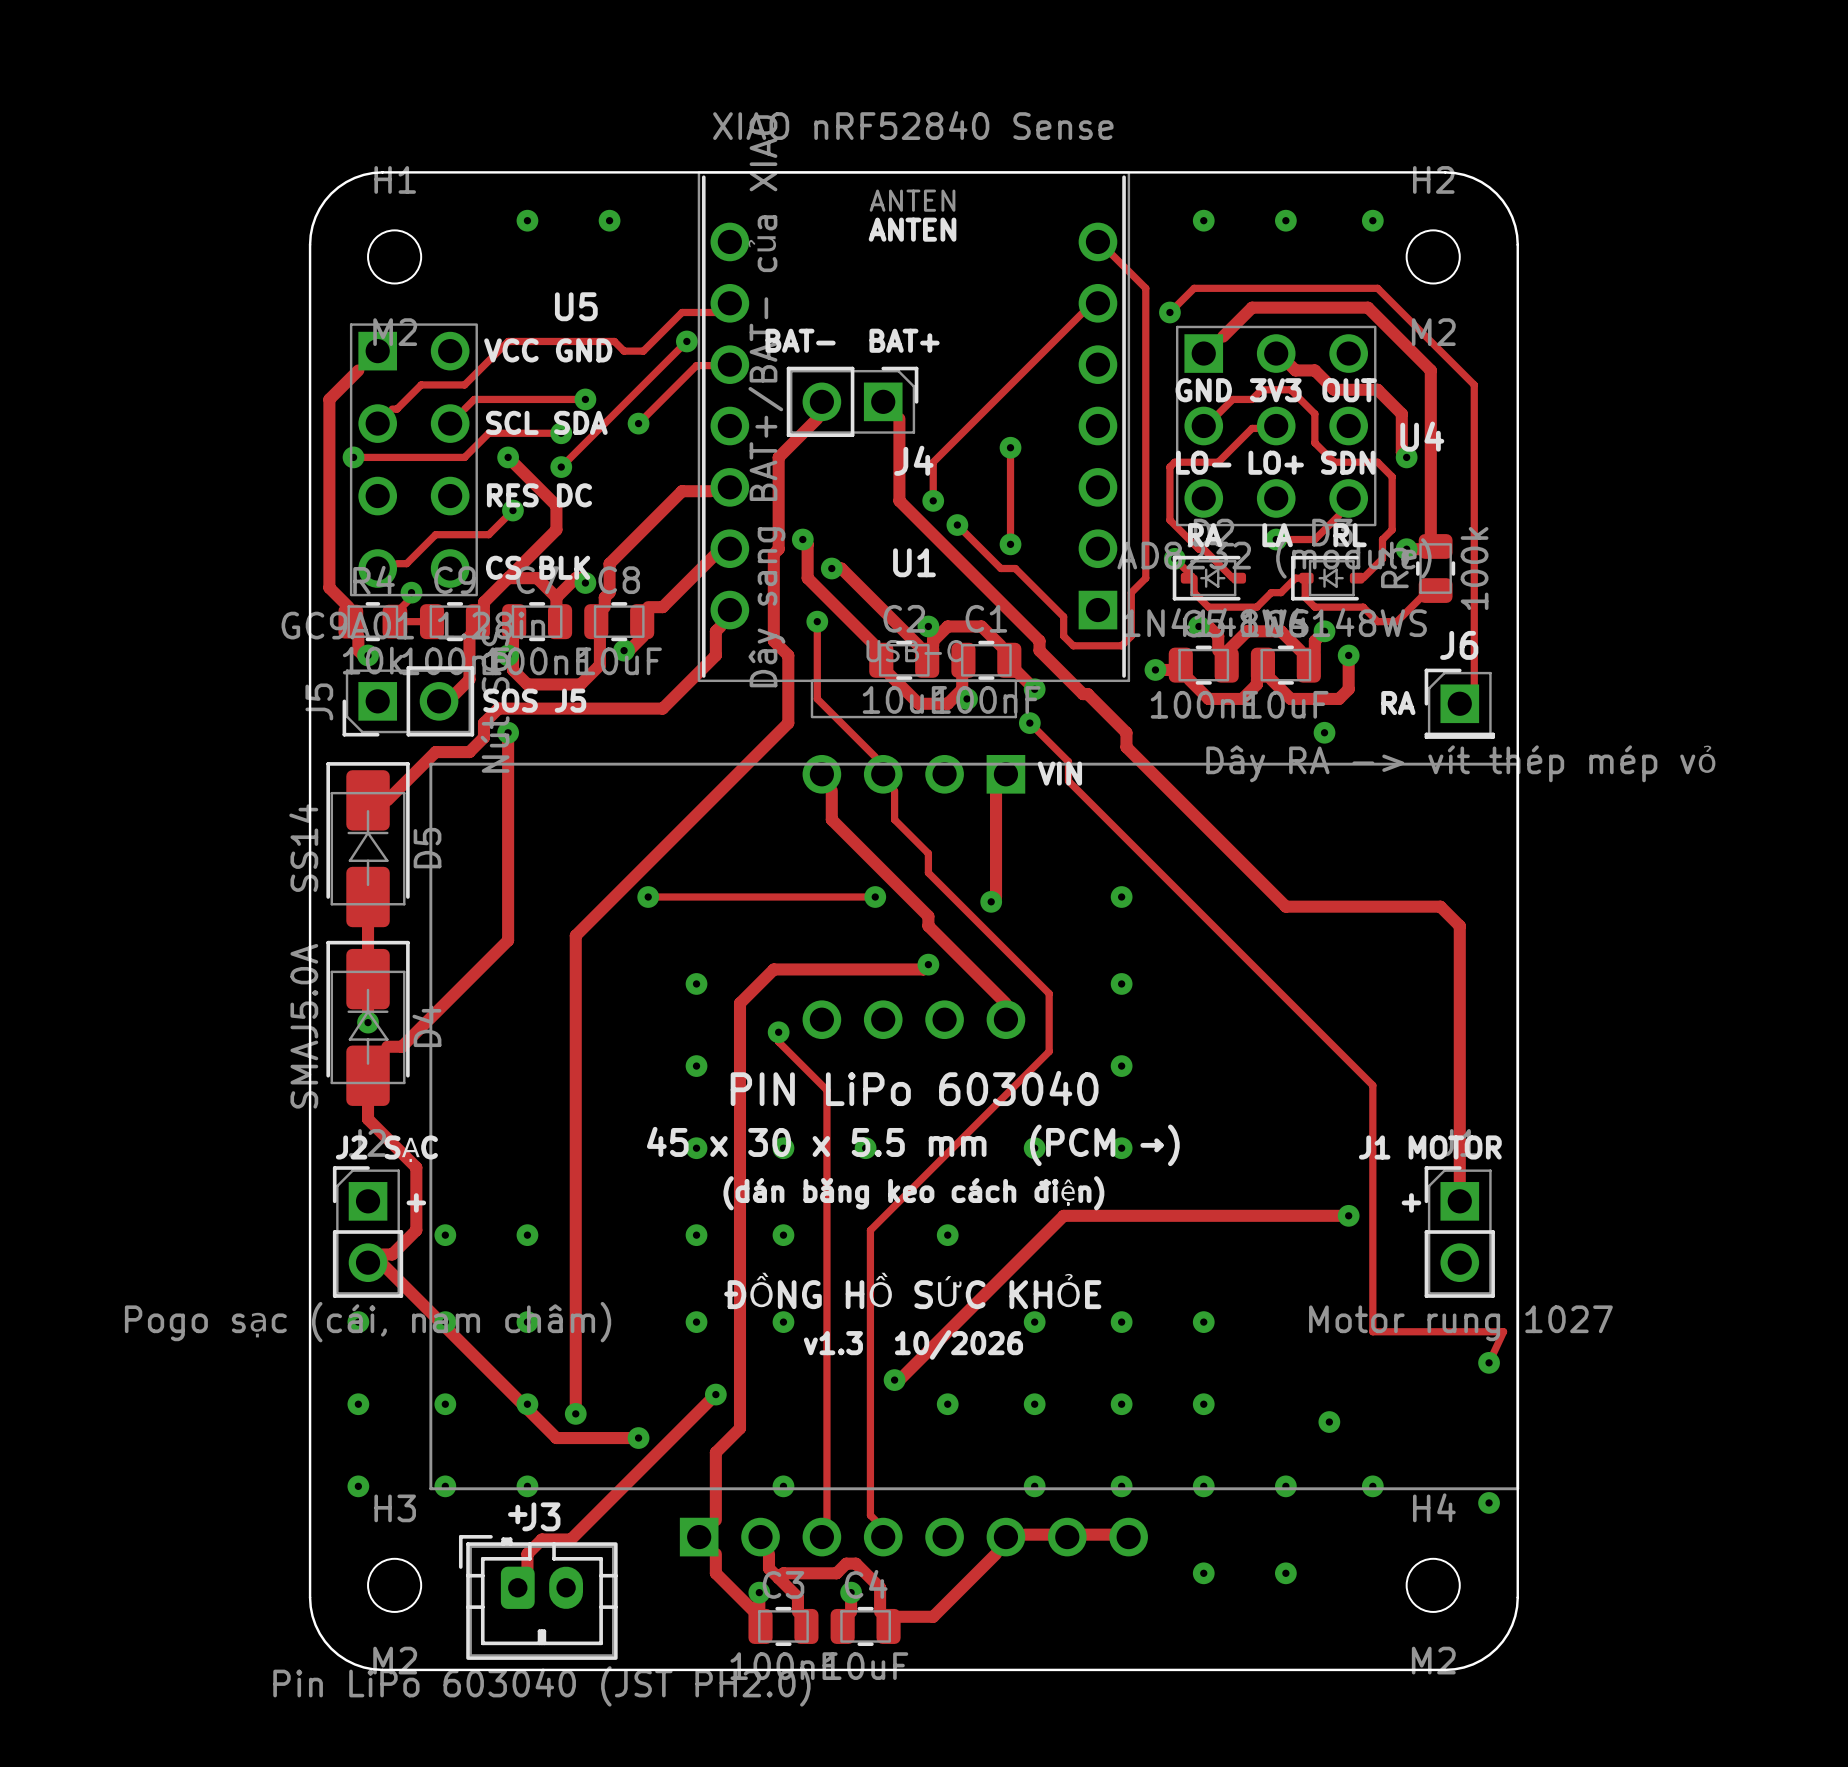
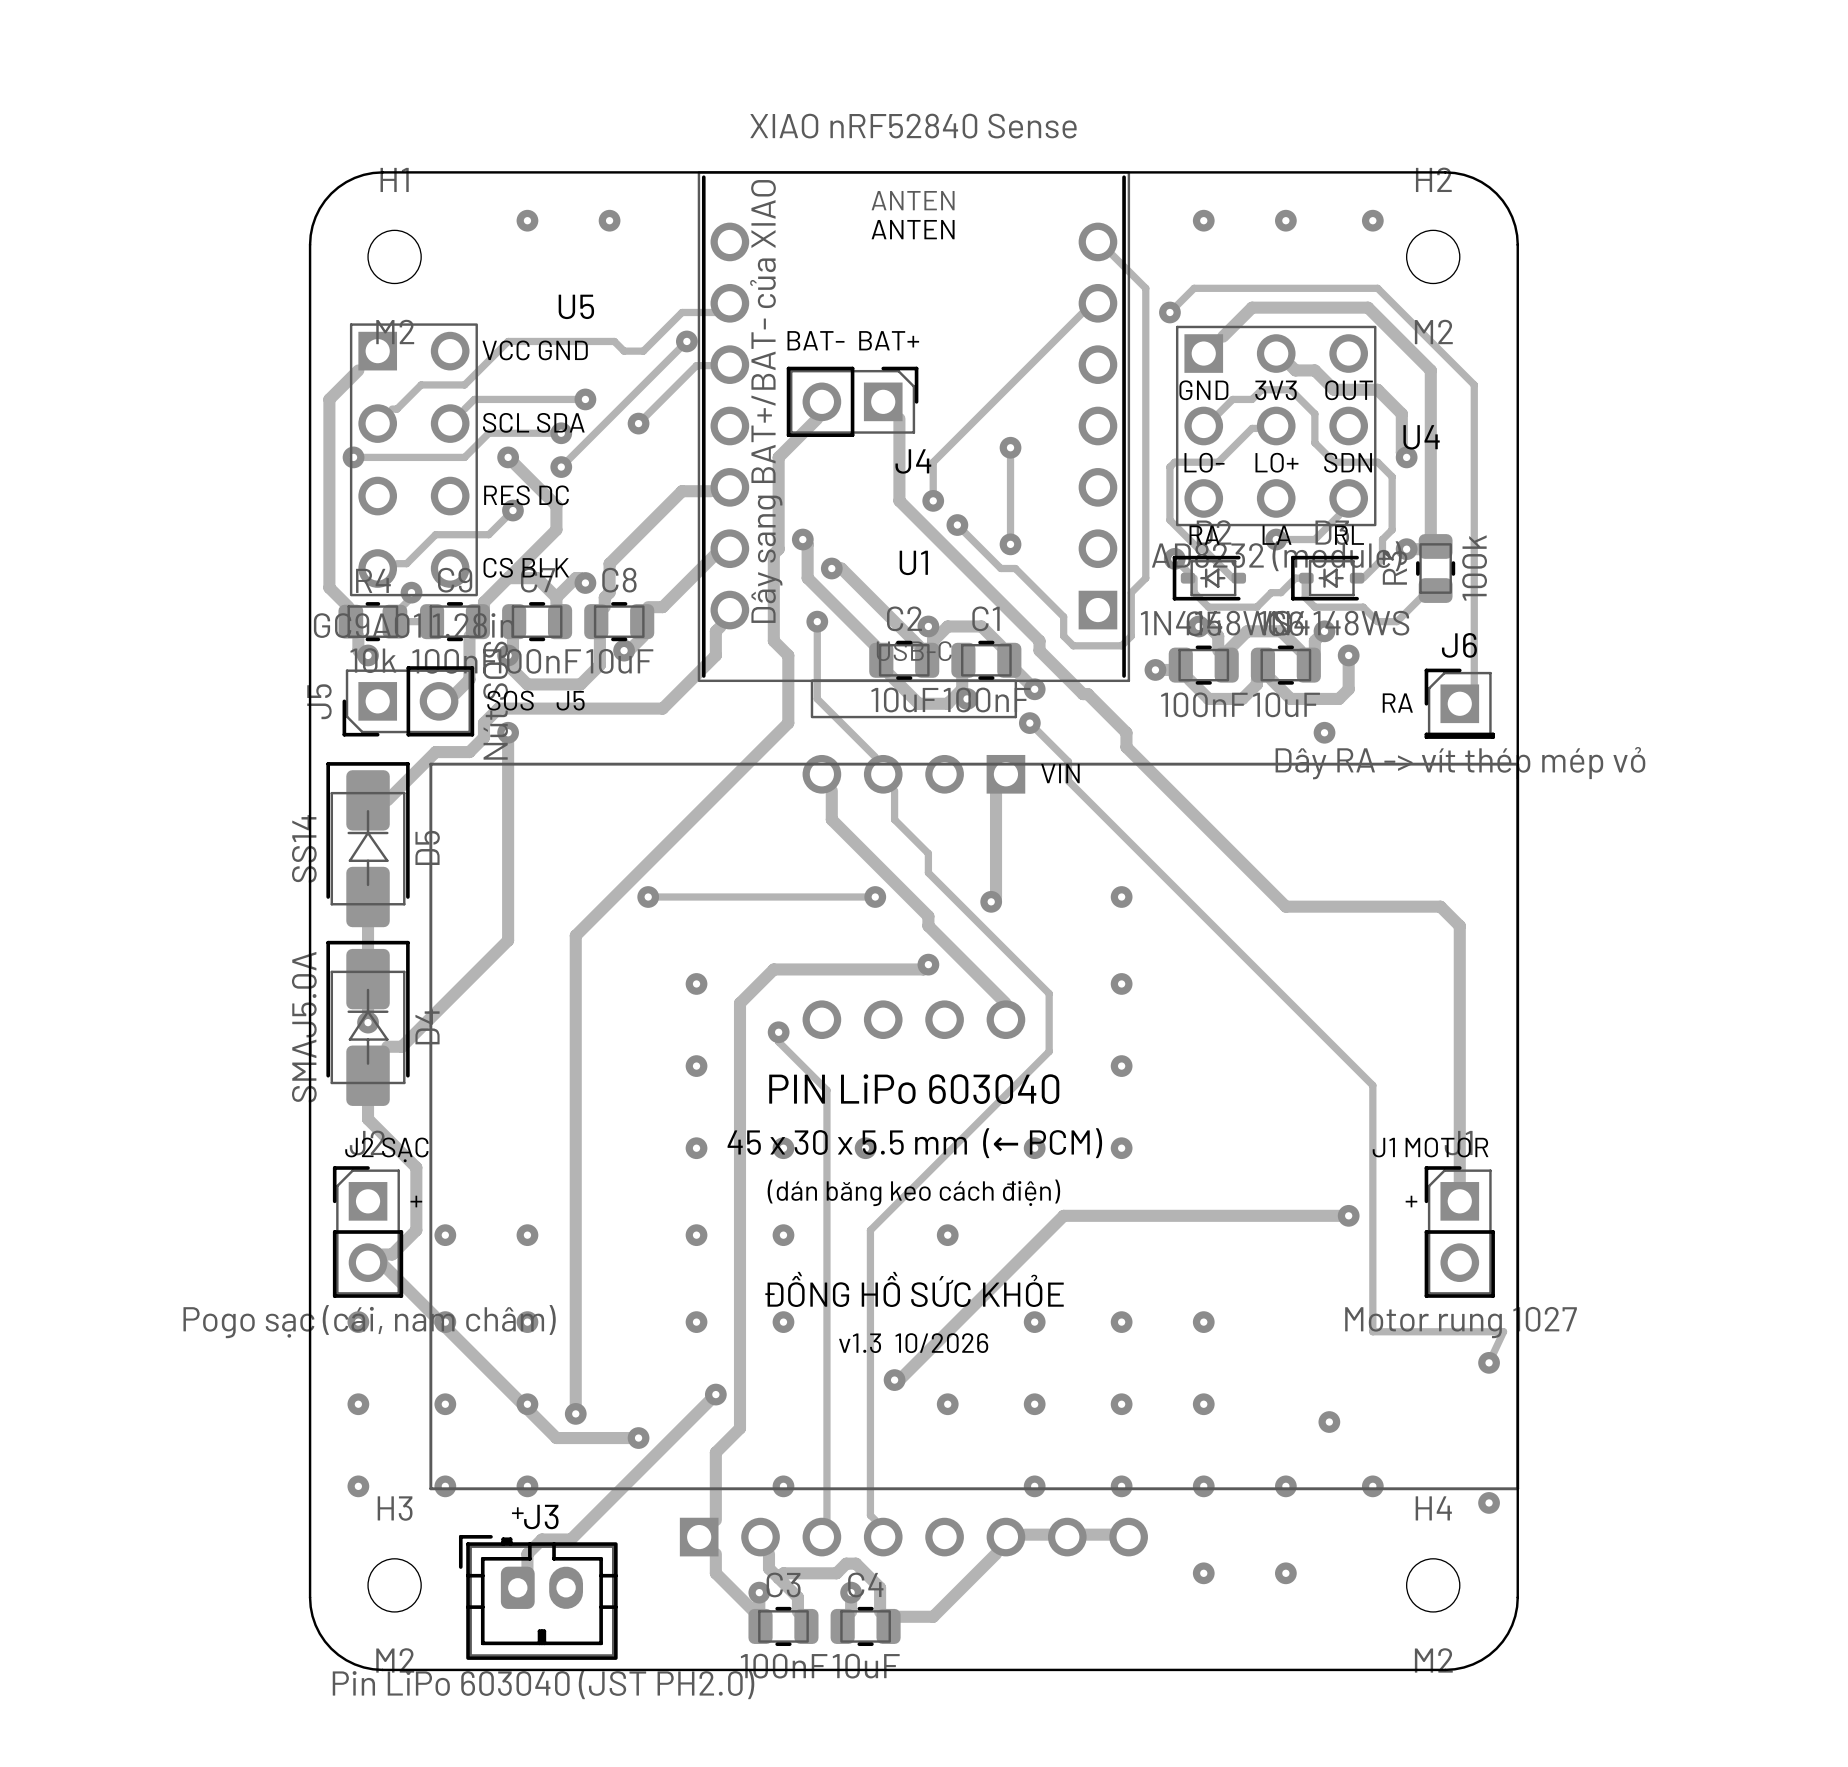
text: 45 x 30 x 5.5 mm (PCM →) (913, 1145) -> 45 x 30 x 5.5 mm (← PCM) (914, 1143)

